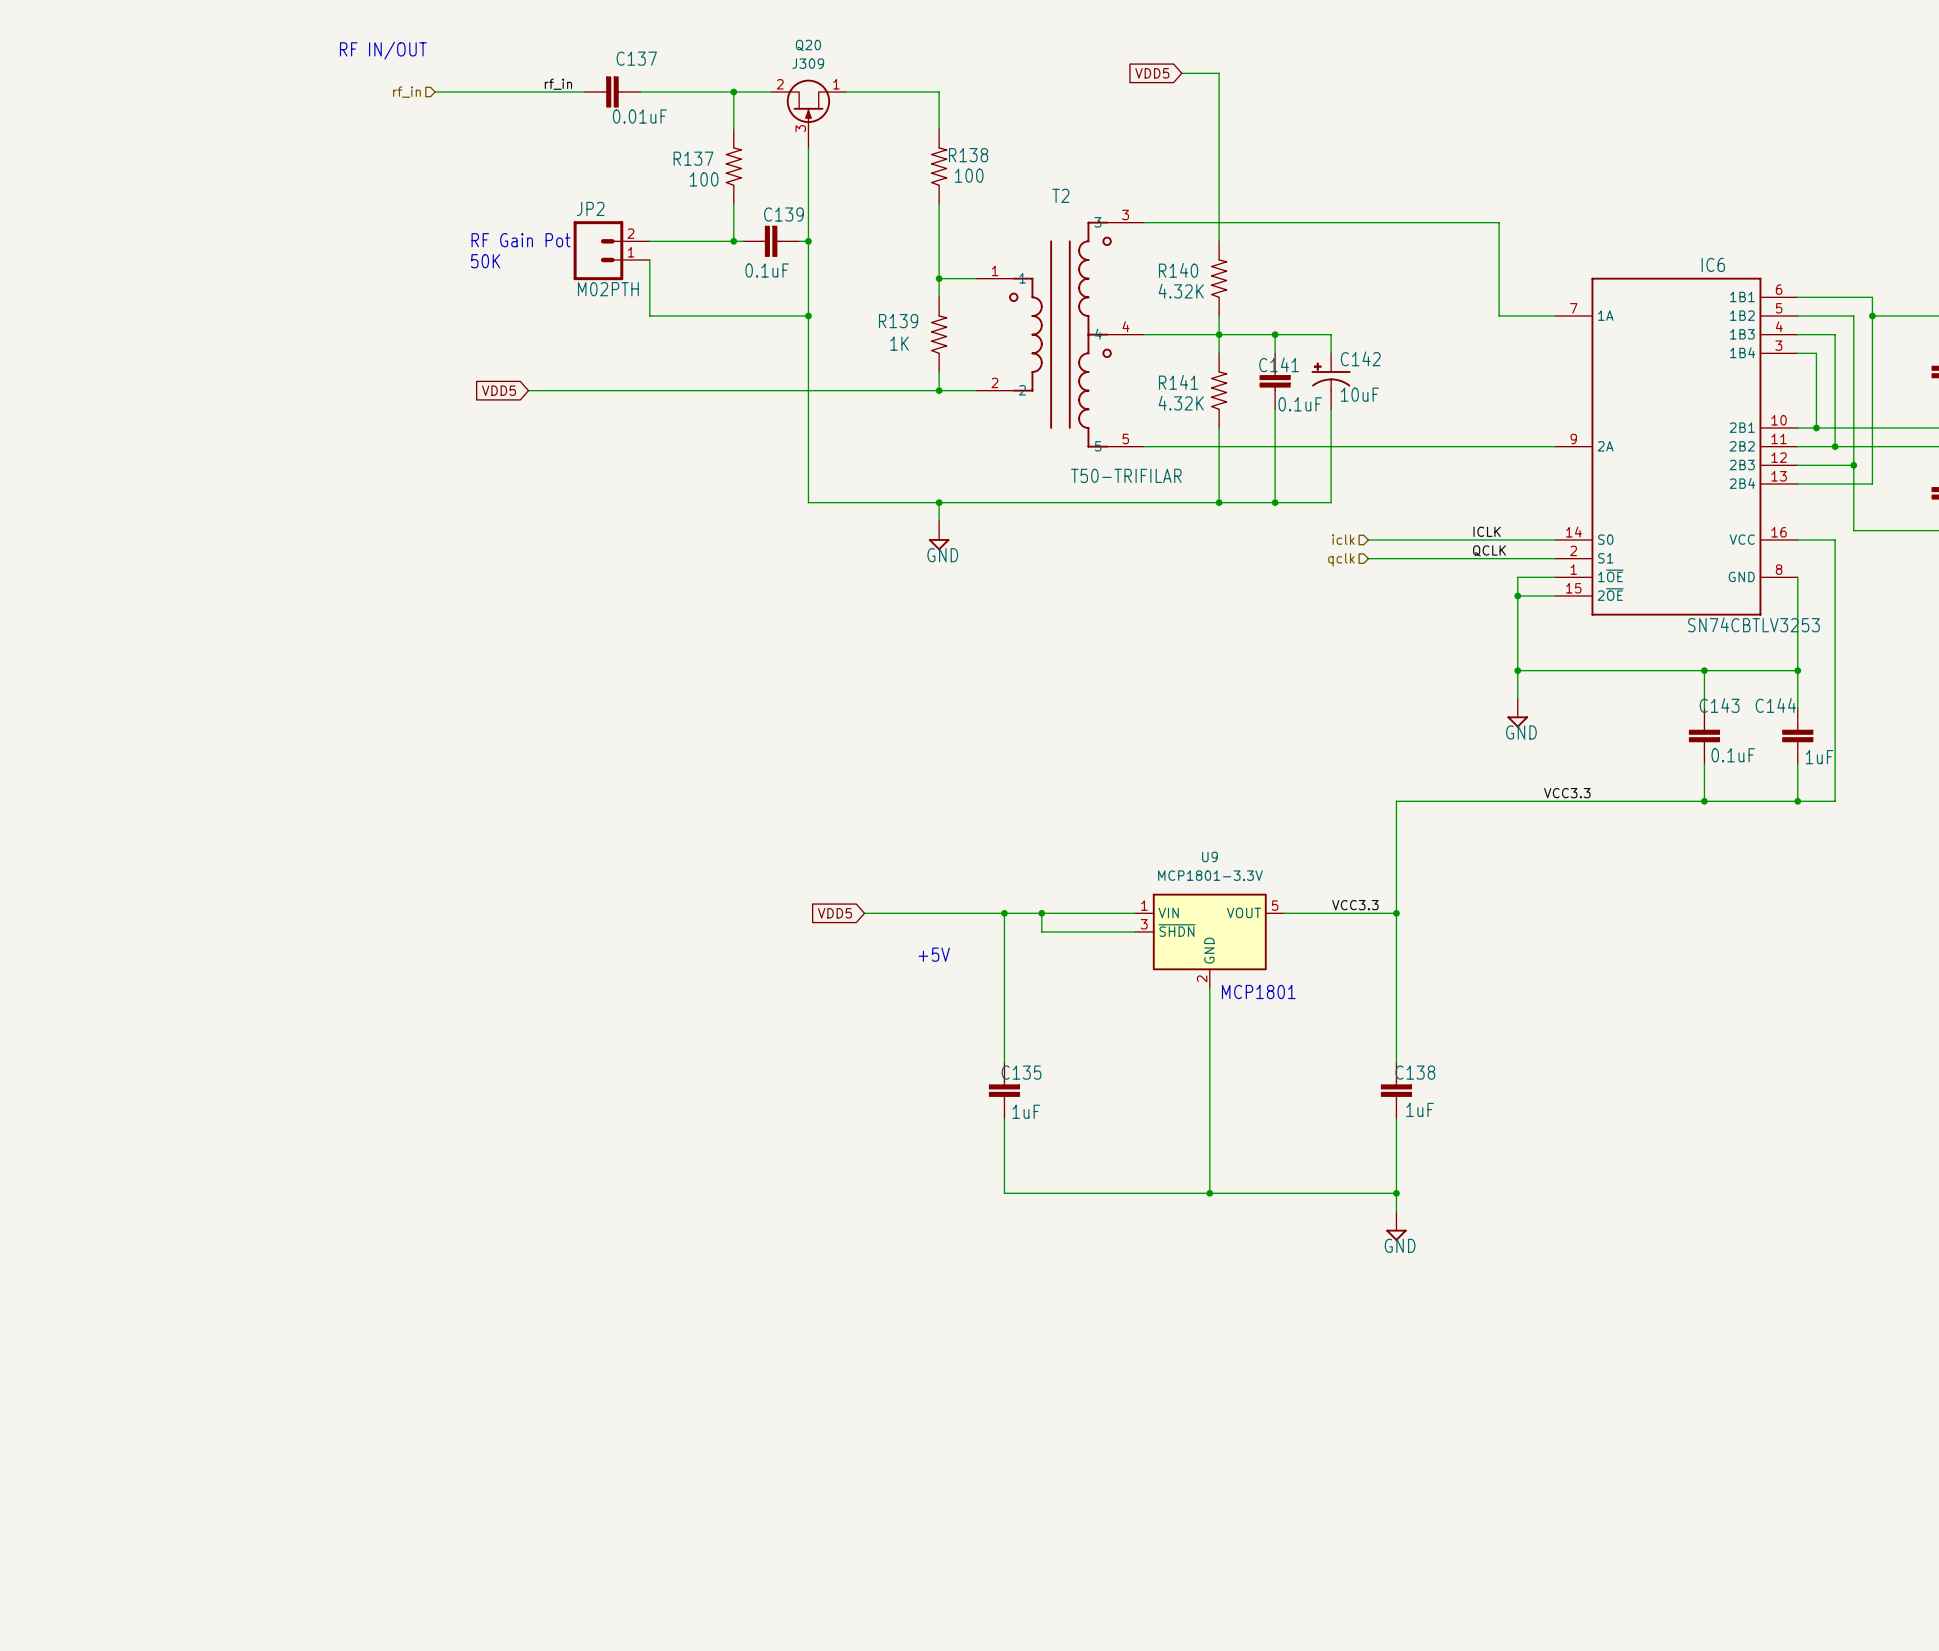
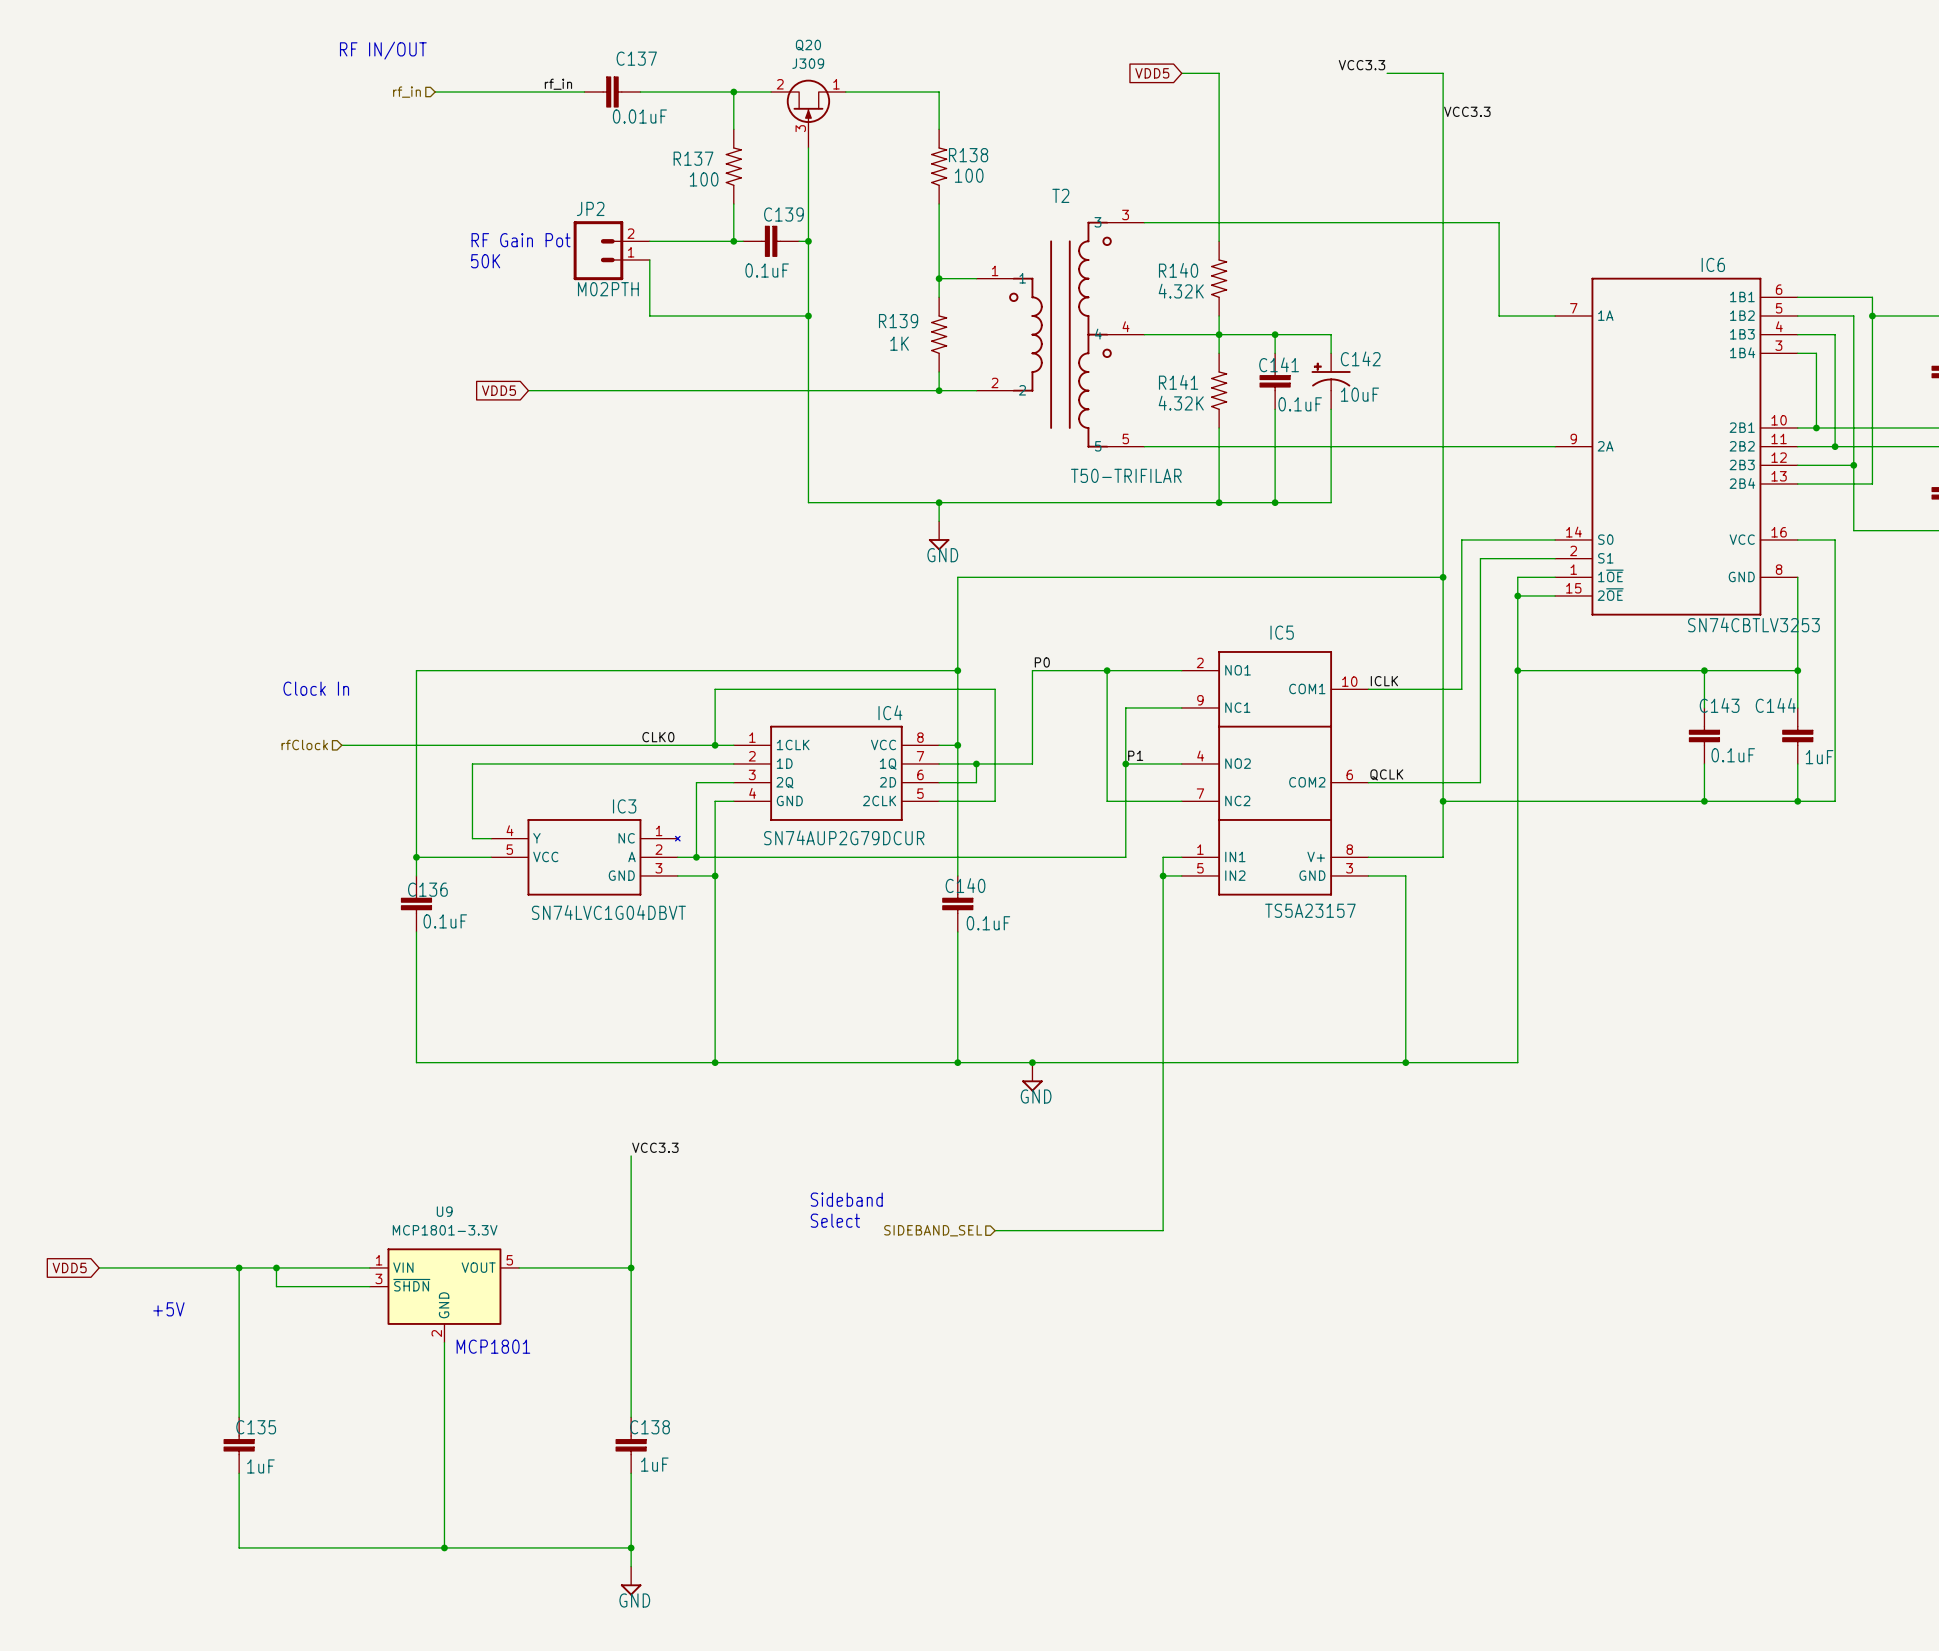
label: none -> VCC3.3 (1361, 65)
wire: none -> (1387, 73) (1443, 73) (1443, 857) (1368, 857)
label: none -> VCC3.3 (1467, 111)
label position: ICLK (1487, 531) -> ICLK (1384, 681)
hierarchical label: iclk (1343, 539) -> none
wire: (1368, 539) (1461, 539) -> (1368, 689) (1461, 689) (1461, 539)
label: QCLK (1489, 550) -> none
wire: (1368, 558) (1480, 558) -> (1368, 782) (1480, 782) (1480, 558)
hierarchical label: qclk (1341, 559) -> none
wire: none -> (1443, 577) (957, 577) (957, 875)
junction: none -> (1443, 577)
label: none -> P0 (1042, 662)
wire: none -> (957, 670) (416, 670) (416, 875)
junction: none -> (957, 670)
wire: none -> (1107, 670) (1107, 801) (1181, 801)
junction: none -> (1107, 670)
wire: none -> (1181, 670) (1032, 670) (1032, 763) (939, 763)
text: none -> Clock In (316, 688)
wire: none -> (1517, 698) (1517, 1062) (416, 1062) (416, 931)
wire: none -> (1181, 707) (1125, 707) (1125, 857) (677, 857)
power symbol: GND (1517, 713) -> none
label: none -> CLK0 (658, 737)
hierarchical label: none -> rfClock (304, 744)
wire: none -> (341, 745) (733, 745)
wire: none -> (715, 745) (715, 689) (995, 689) (995, 801) (939, 801)
junction: none -> (715, 745)
wire: none -> (939, 745) (957, 745)
junction: none -> (957, 745)
label: none -> P1 (1135, 755)
wire: none -> (733, 763) (472, 763) (472, 838) (491, 838)
wire: none -> (976, 763) (976, 782) (939, 782)
junction: none -> (976, 763)
wire: none -> (1125, 763) (1181, 763)
junction: none -> (1125, 763)
IC4: none -> SN74AUP2G79DCUR (836, 773)
IC5: none -> TS5A23157 (1275, 773)
label: none -> QCLK (1386, 774)
wire: none -> (733, 782) (696, 782) (696, 857)
label: VCC3.3 (1567, 793) -> none
wire: none -> (733, 801) (715, 801) (715, 1062)
wire: (1443, 801) (1396, 801) (1396, 1062) -> none
junction: none -> (1443, 801)
wire: none -> (416, 857) (491, 857)
junction: none -> (416, 857)
IC3: none -> SN74LVC1G04DBVT (585, 857)
junction: none -> (696, 857)
wire: none -> (1181, 857) (1163, 857) (1163, 1230) (995, 1230)
wire: none -> (677, 875) (715, 875)
junction: none -> (715, 875)
wire: none -> (1163, 875) (1181, 875)
junction: none -> (1163, 875)
wire: none -> (1368, 875) (1405, 875) (1405, 1062)
C136: none -> 0.1uF (416, 903)
C140: none -> 0.1uF (957, 903)
label: VCC3.3 (1355, 905) -> none
global label: VDD5 (834, 913) -> none
wire: (864, 913) (1135, 913) -> none
wire: (1004, 913) (1004, 1062) -> none
junction: (1004, 913) -> none
wire: (1041, 913) (1041, 931) (1135, 931) -> none
junction: (1041, 913) -> none
wire: (1284, 913) (1396, 913) -> none
junction: (1396, 913) -> none
wire: none -> (957, 931) (957, 1062)
U9 position: (1209, 940) -> (444, 1295)
text: +5V (934, 954) -> none
wire: (1209, 987) (1209, 1193) -> none
text: MCP1801 (1258, 992) -> none
junction: none -> (715, 1062)
junction: none -> (957, 1062)
junction: none -> (1032, 1062)
junction: none -> (1405, 1062)
power symbol: none -> GND (1032, 1077)
C135 position: (1004, 1090) -> (239, 1445)
C138 position: (1396, 1090) -> (631, 1445)
wire: (1004, 1118) (1004, 1193) (1396, 1193) -> none
wire: (1396, 1118) (1396, 1211) -> none
label: none -> VCC3.3 (655, 1147)
wire: none -> (631, 1155) (631, 1417)
junction: (1209, 1193) -> none
junction: (1396, 1193) -> none
text: none -> Sideband (846, 1199)
text: none -> Select (835, 1220)
power symbol: GND (1396, 1226) -> none
hierarchical label: none -> SIDEBAND_SEL (933, 1230)
global label: none -> VDD5 (69, 1267)
wire: none -> (99, 1267) (369, 1267)
wire: none -> (239, 1267) (239, 1417)
junction: none -> (239, 1267)
wire: none -> (276, 1267) (276, 1286) (369, 1286)
junction: none -> (276, 1267)
wire: none -> (519, 1267) (631, 1267)
junction: none -> (631, 1267)
text: none -> +5V (168, 1309)
wire: none -> (444, 1342) (444, 1547)
text: none -> MCP1801 (493, 1346)
wire: none -> (239, 1473) (239, 1547) (631, 1547)
wire: none -> (631, 1473) (631, 1566)
junction: none -> (444, 1547)
junction: none -> (631, 1547)
power symbol: none -> GND (631, 1581)

